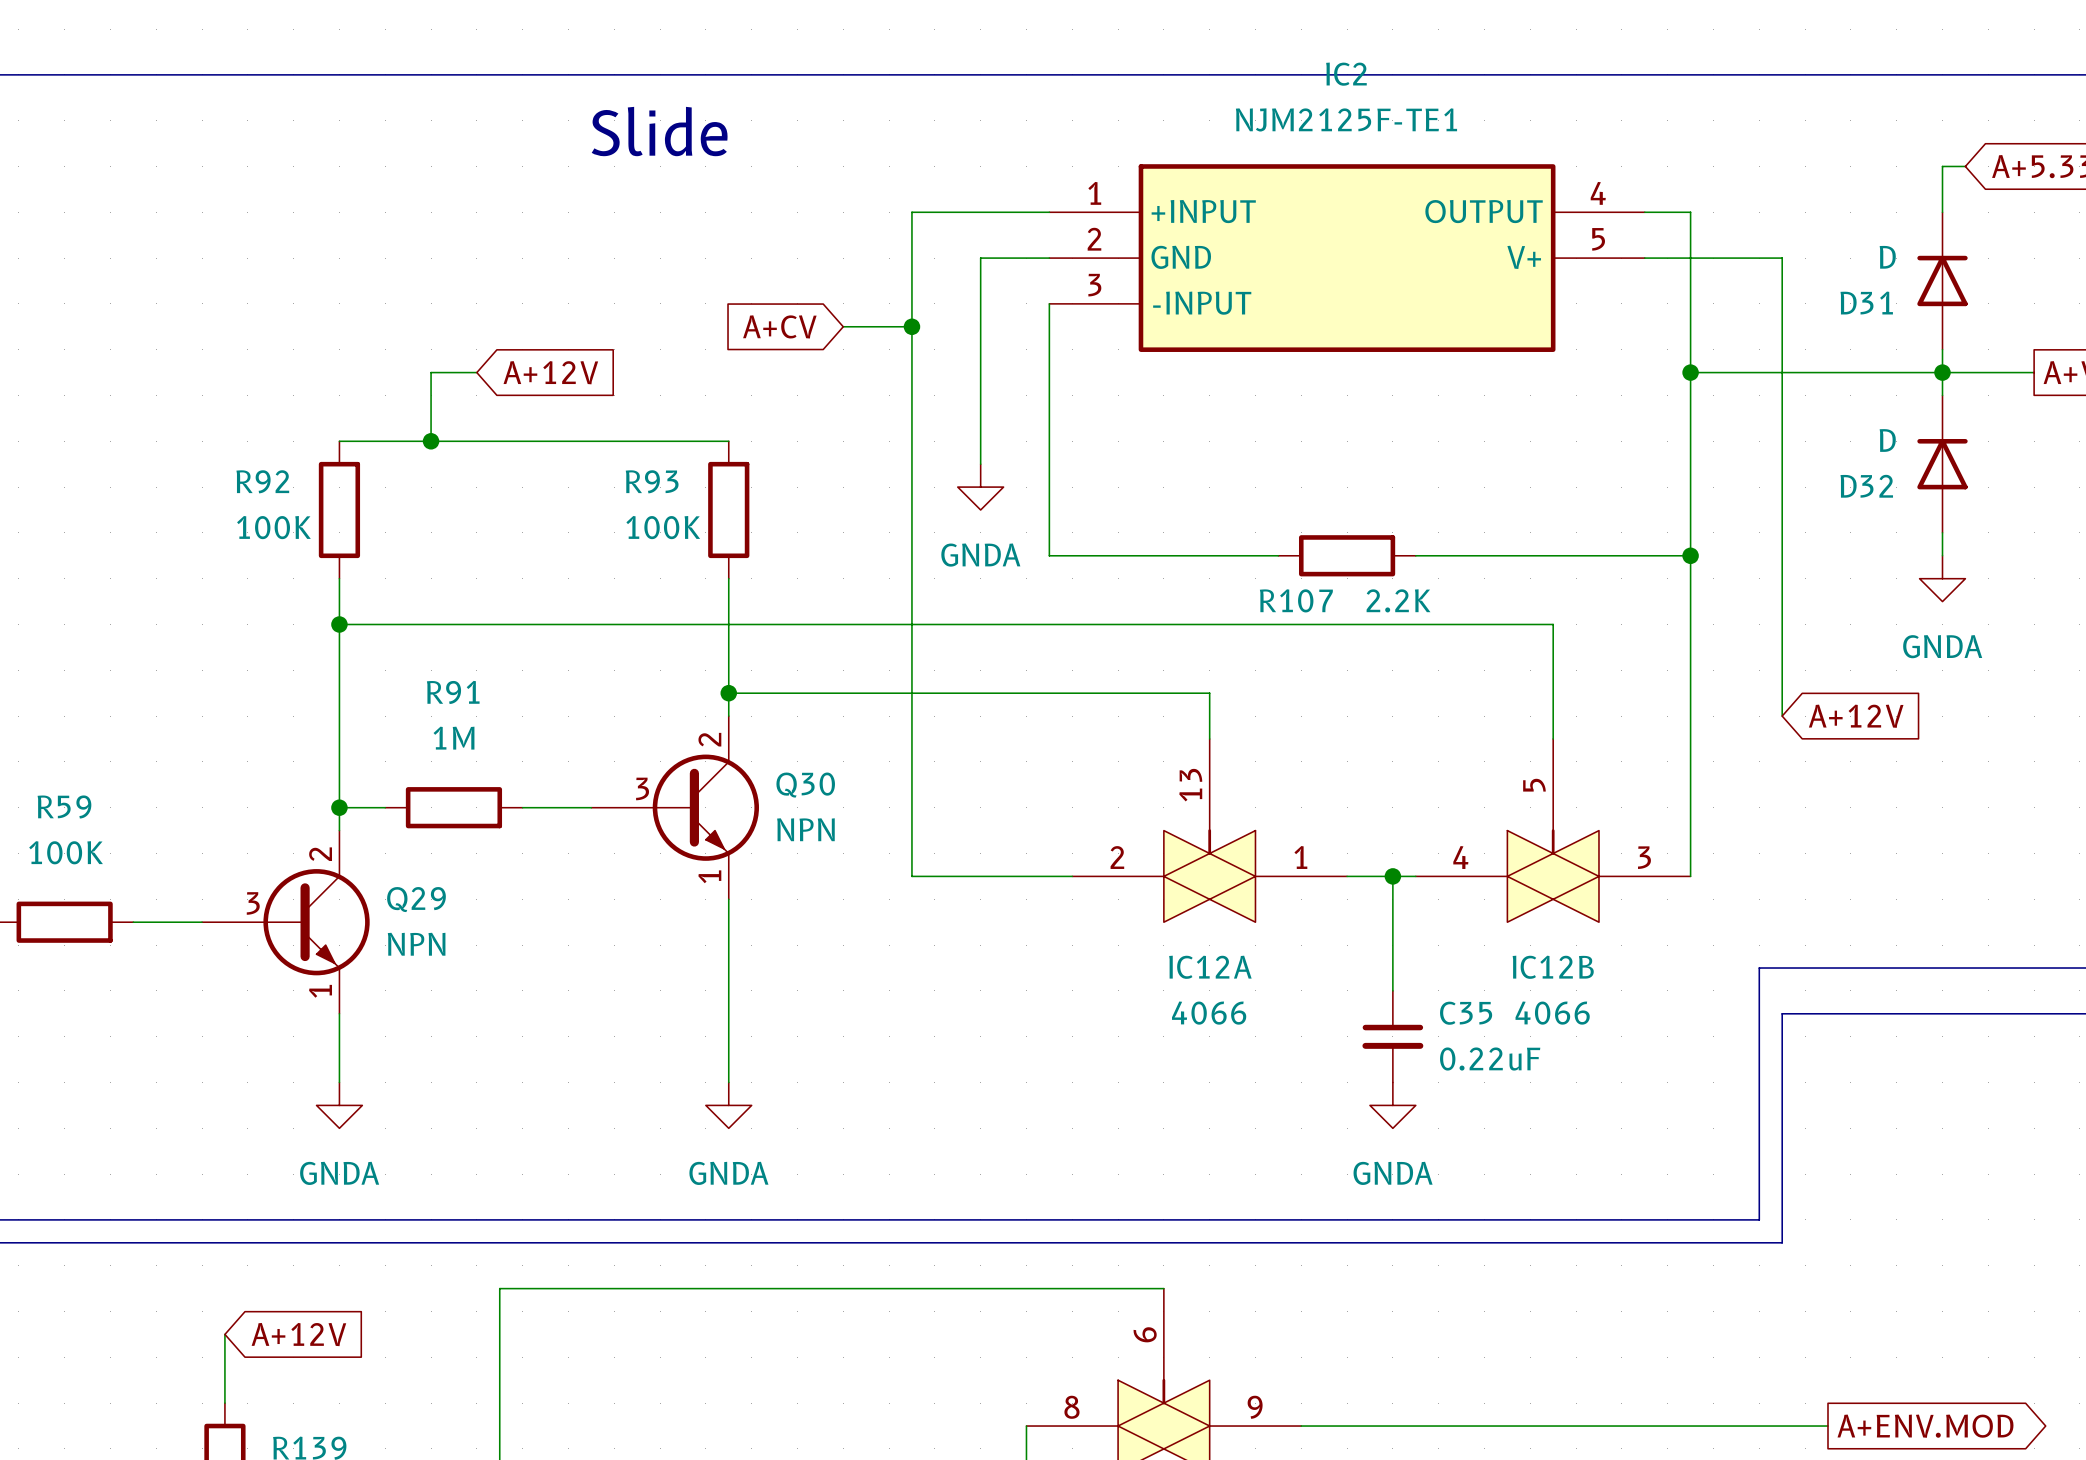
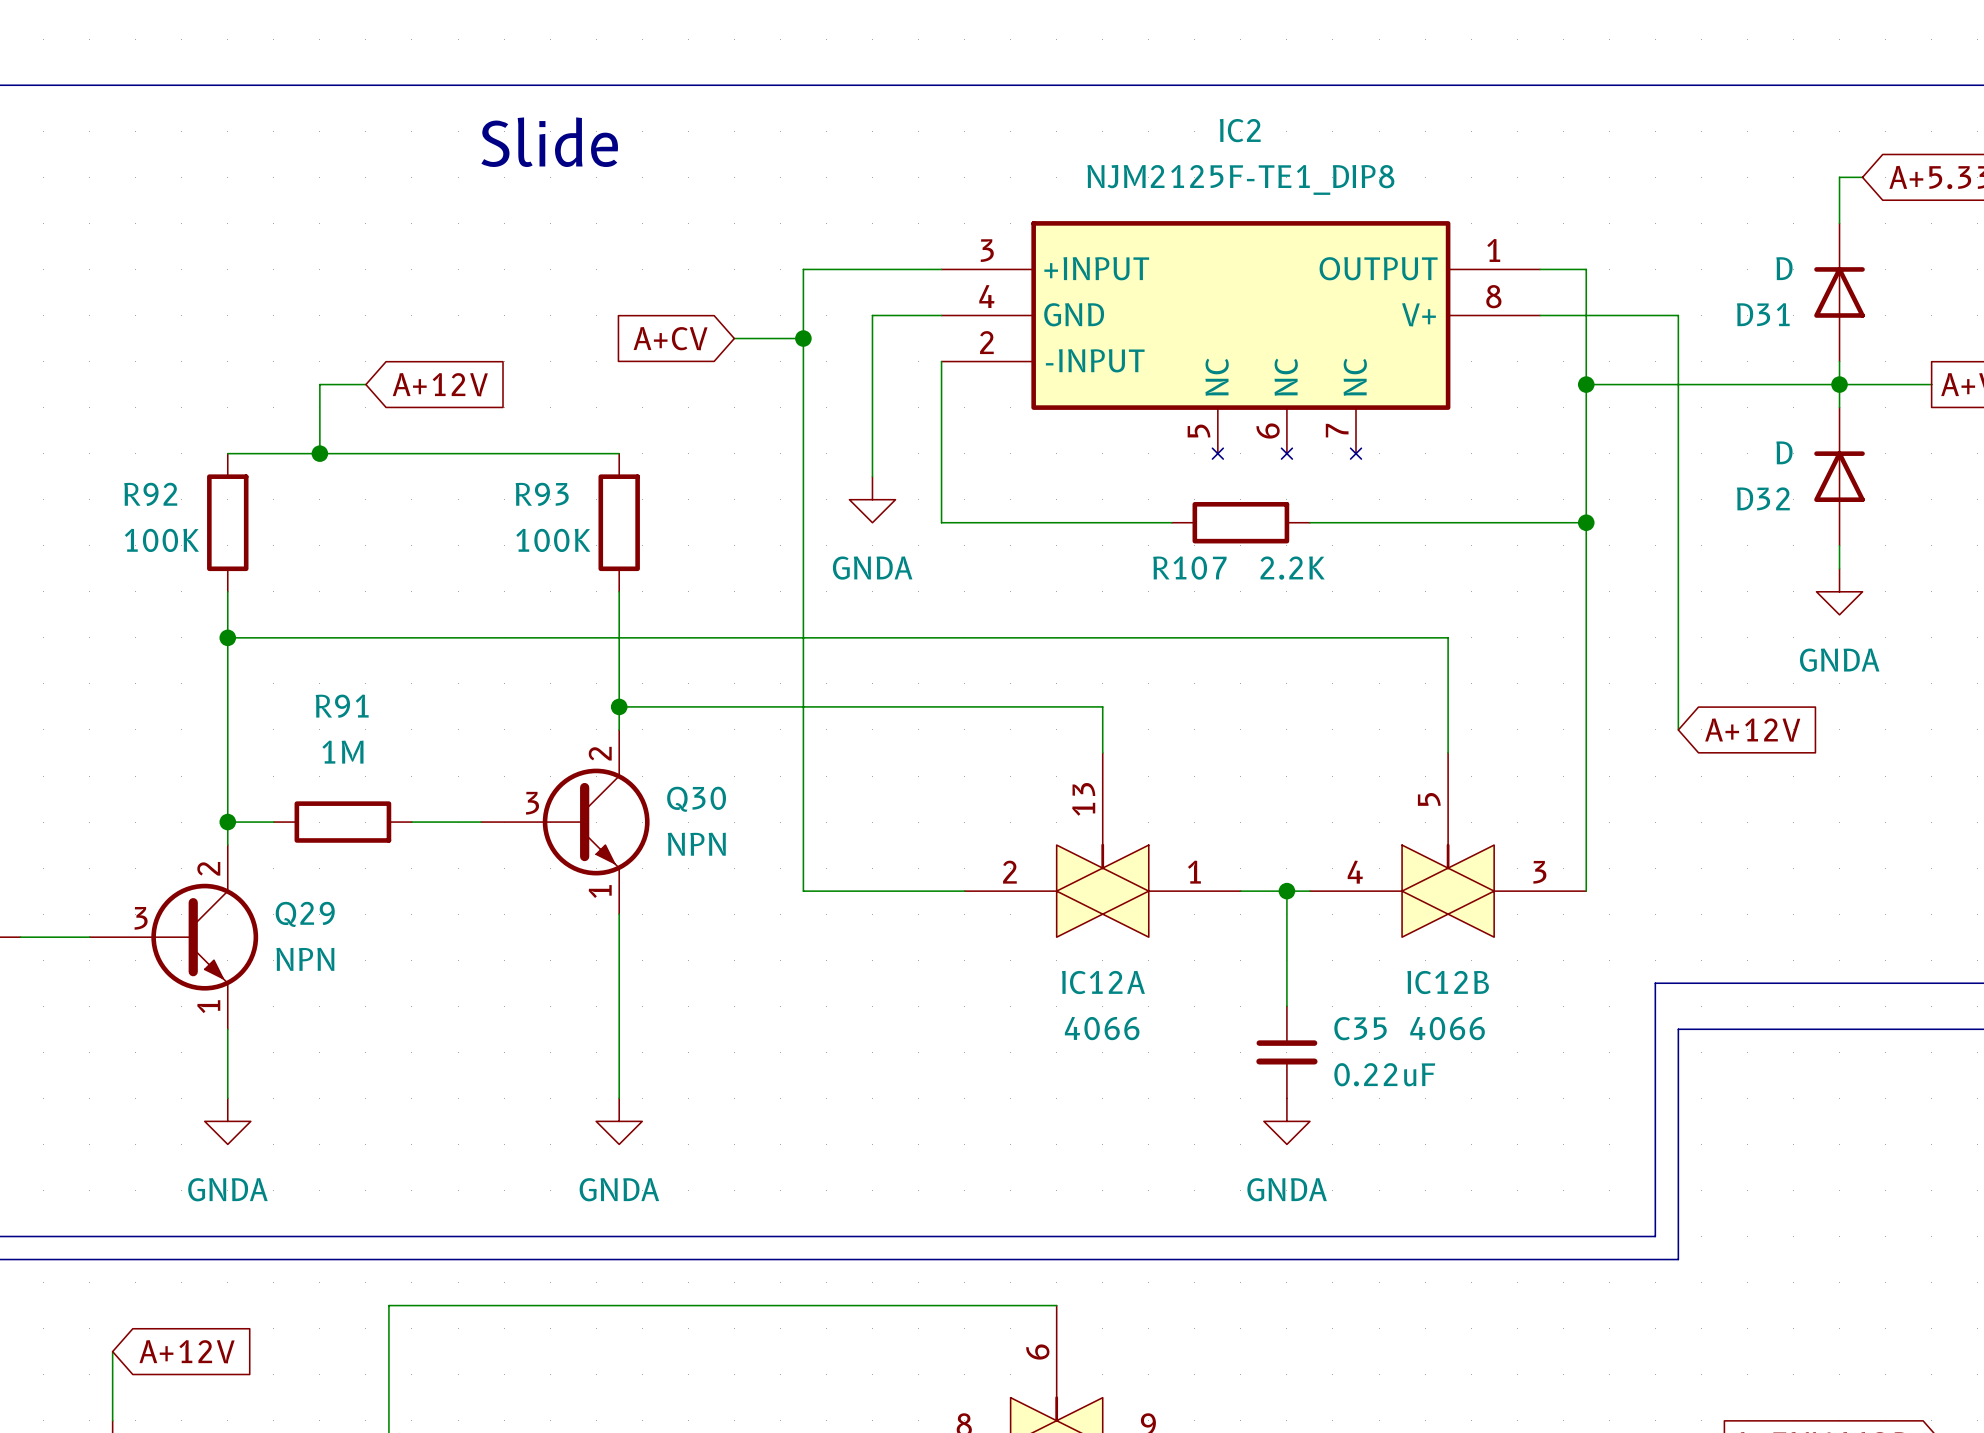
IC2 value: NJM2125F-TE1 (1346, 119) -> NJM2125F-TE1_DIP8 (1240, 179)
IC2 symbol: [1049, 164, 1645, 352] -> [941, 221, 1541, 460]
wire: (1049, 212) (911, 212) (911, 258) -> (872, 269) (803, 269)
wire: (1644, 212) (1690, 212) (1690, 258) (1782, 258) (1782, 303) -> (1540, 315) (1678, 315)
wire: (980, 258) (980, 303) -> none
wire: (1049, 303) (1049, 349) -> (941, 315) (872, 315)
wire: (1049, 509) (1049, 555) (1278, 555) -> (941, 522) (1171, 522)
R107 position: (1347, 555) -> (1240, 522)
wire: (1415, 555) (1690, 555) -> (1309, 522) (1586, 522)
junction position: (1690, 555) -> (1586, 522)

